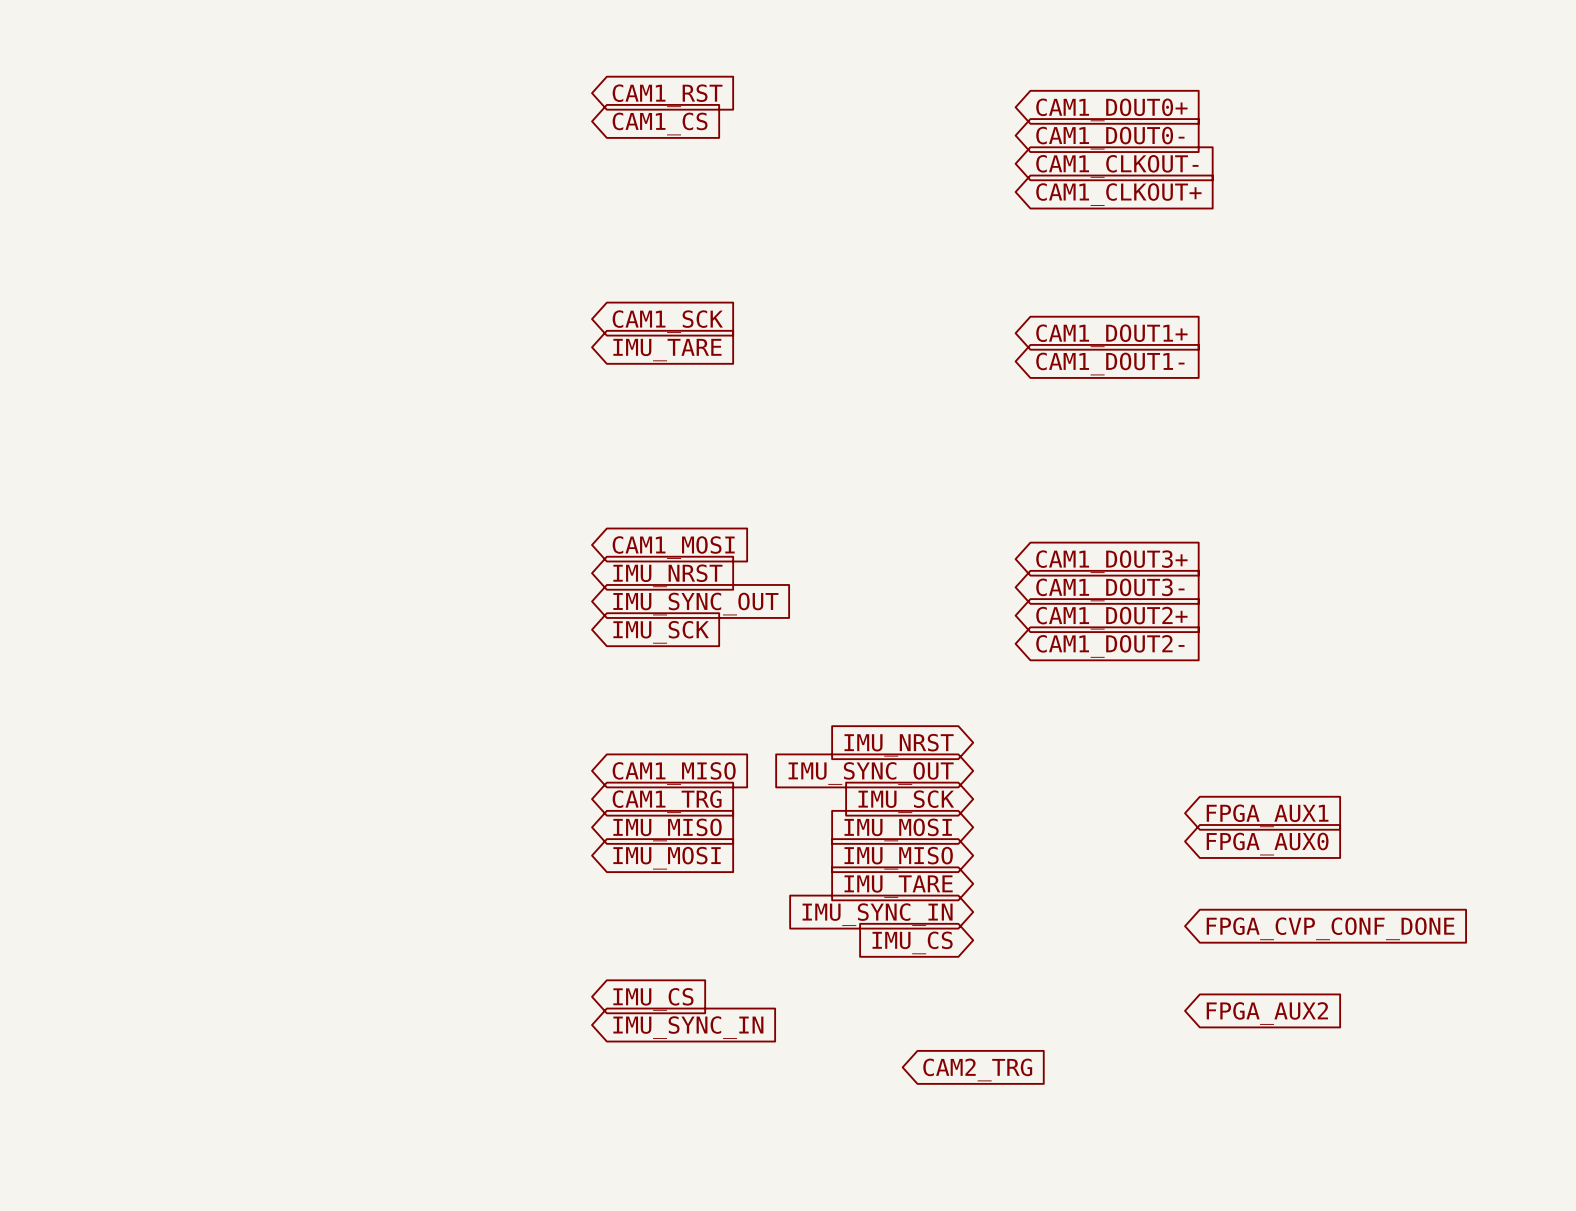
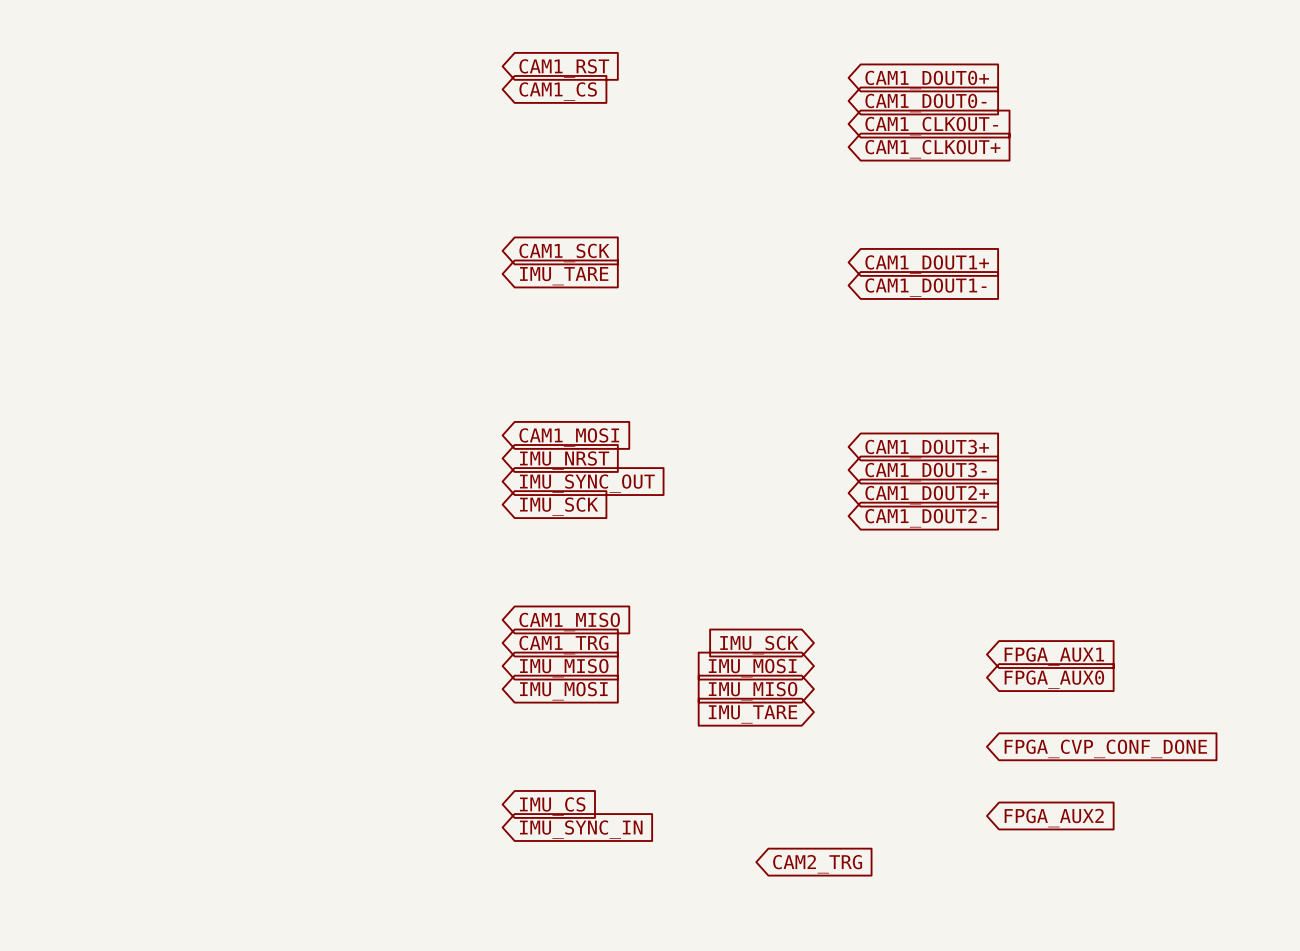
global label: IMU_NRST (899, 745) -> none
global label: IMU_SYNC_OUT (871, 773) -> none
global label: IMU_SYNC_IN (877, 914) -> none
global label: IMU_CS (912, 942) -> none

